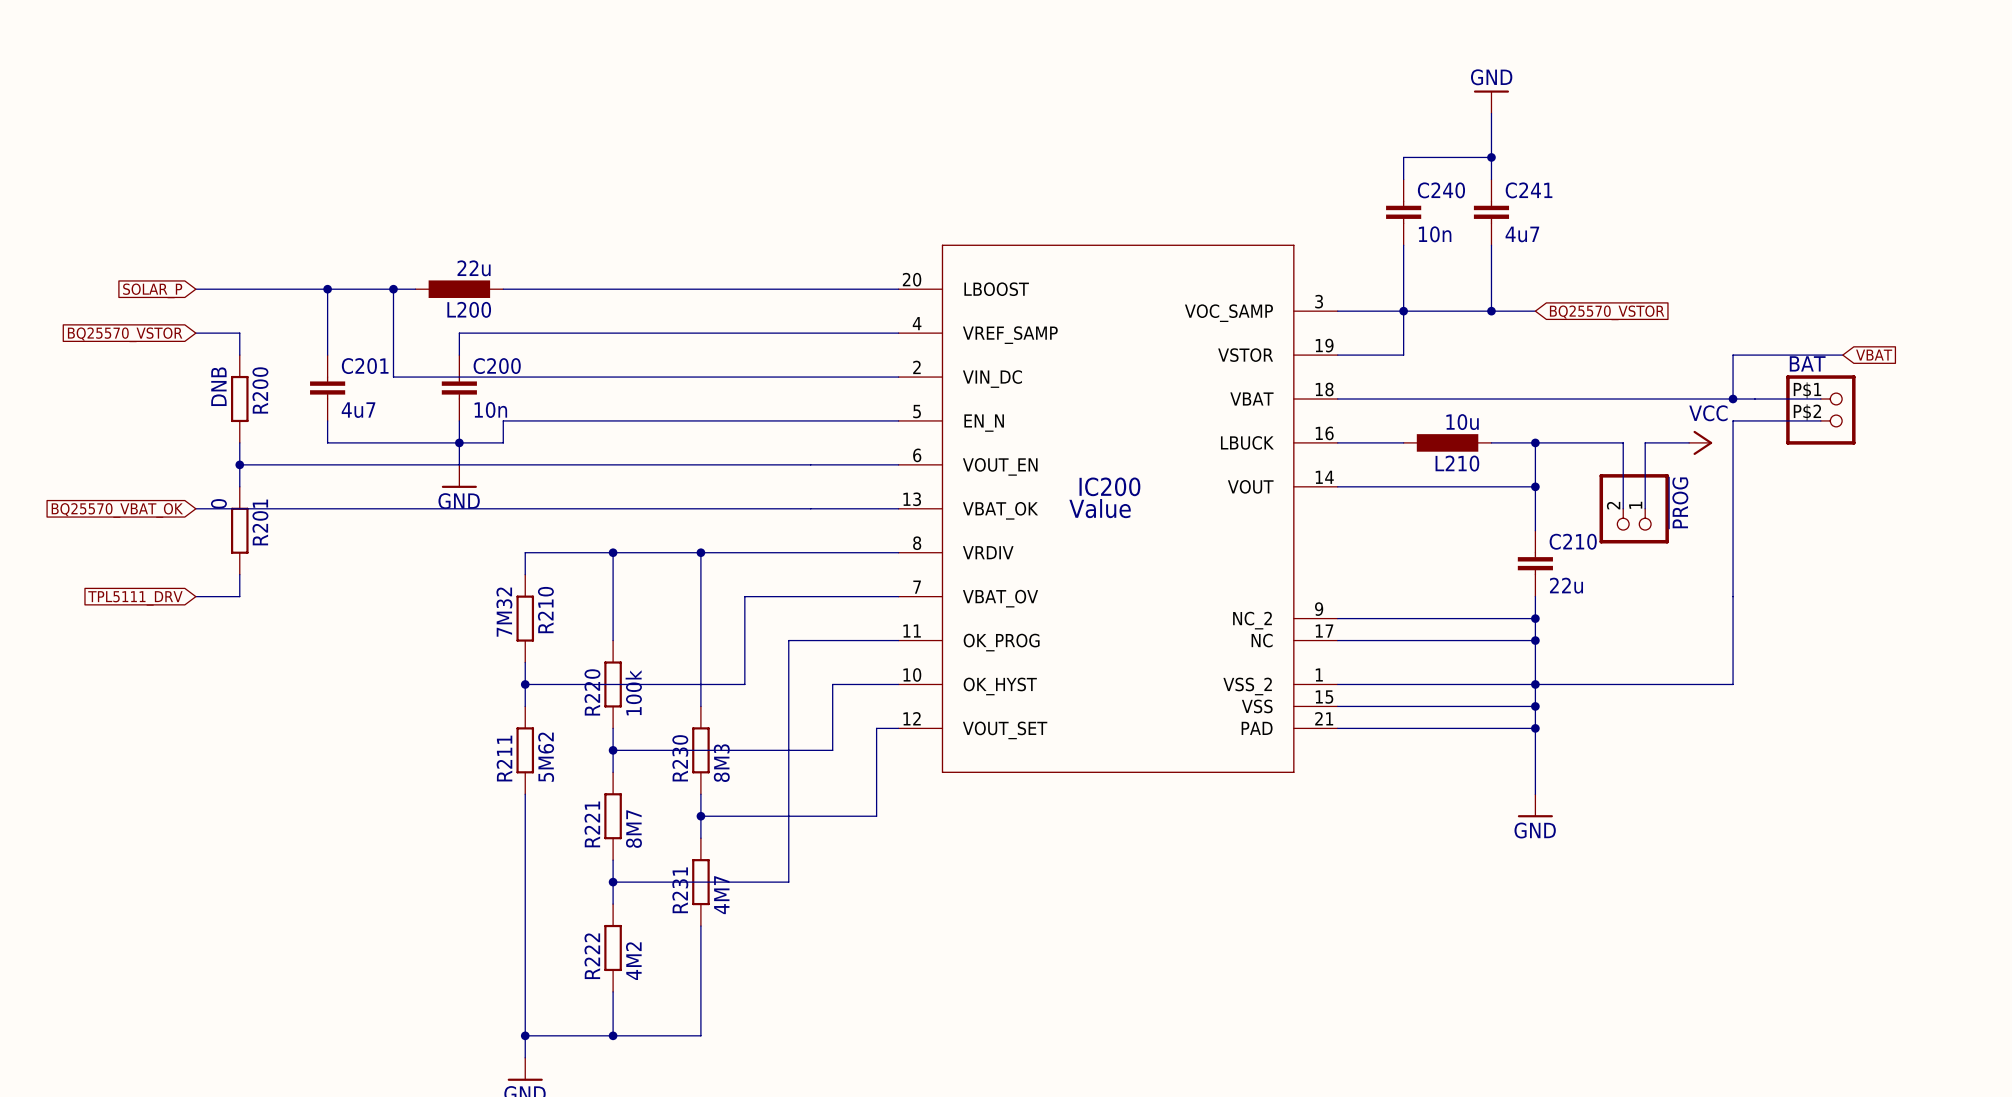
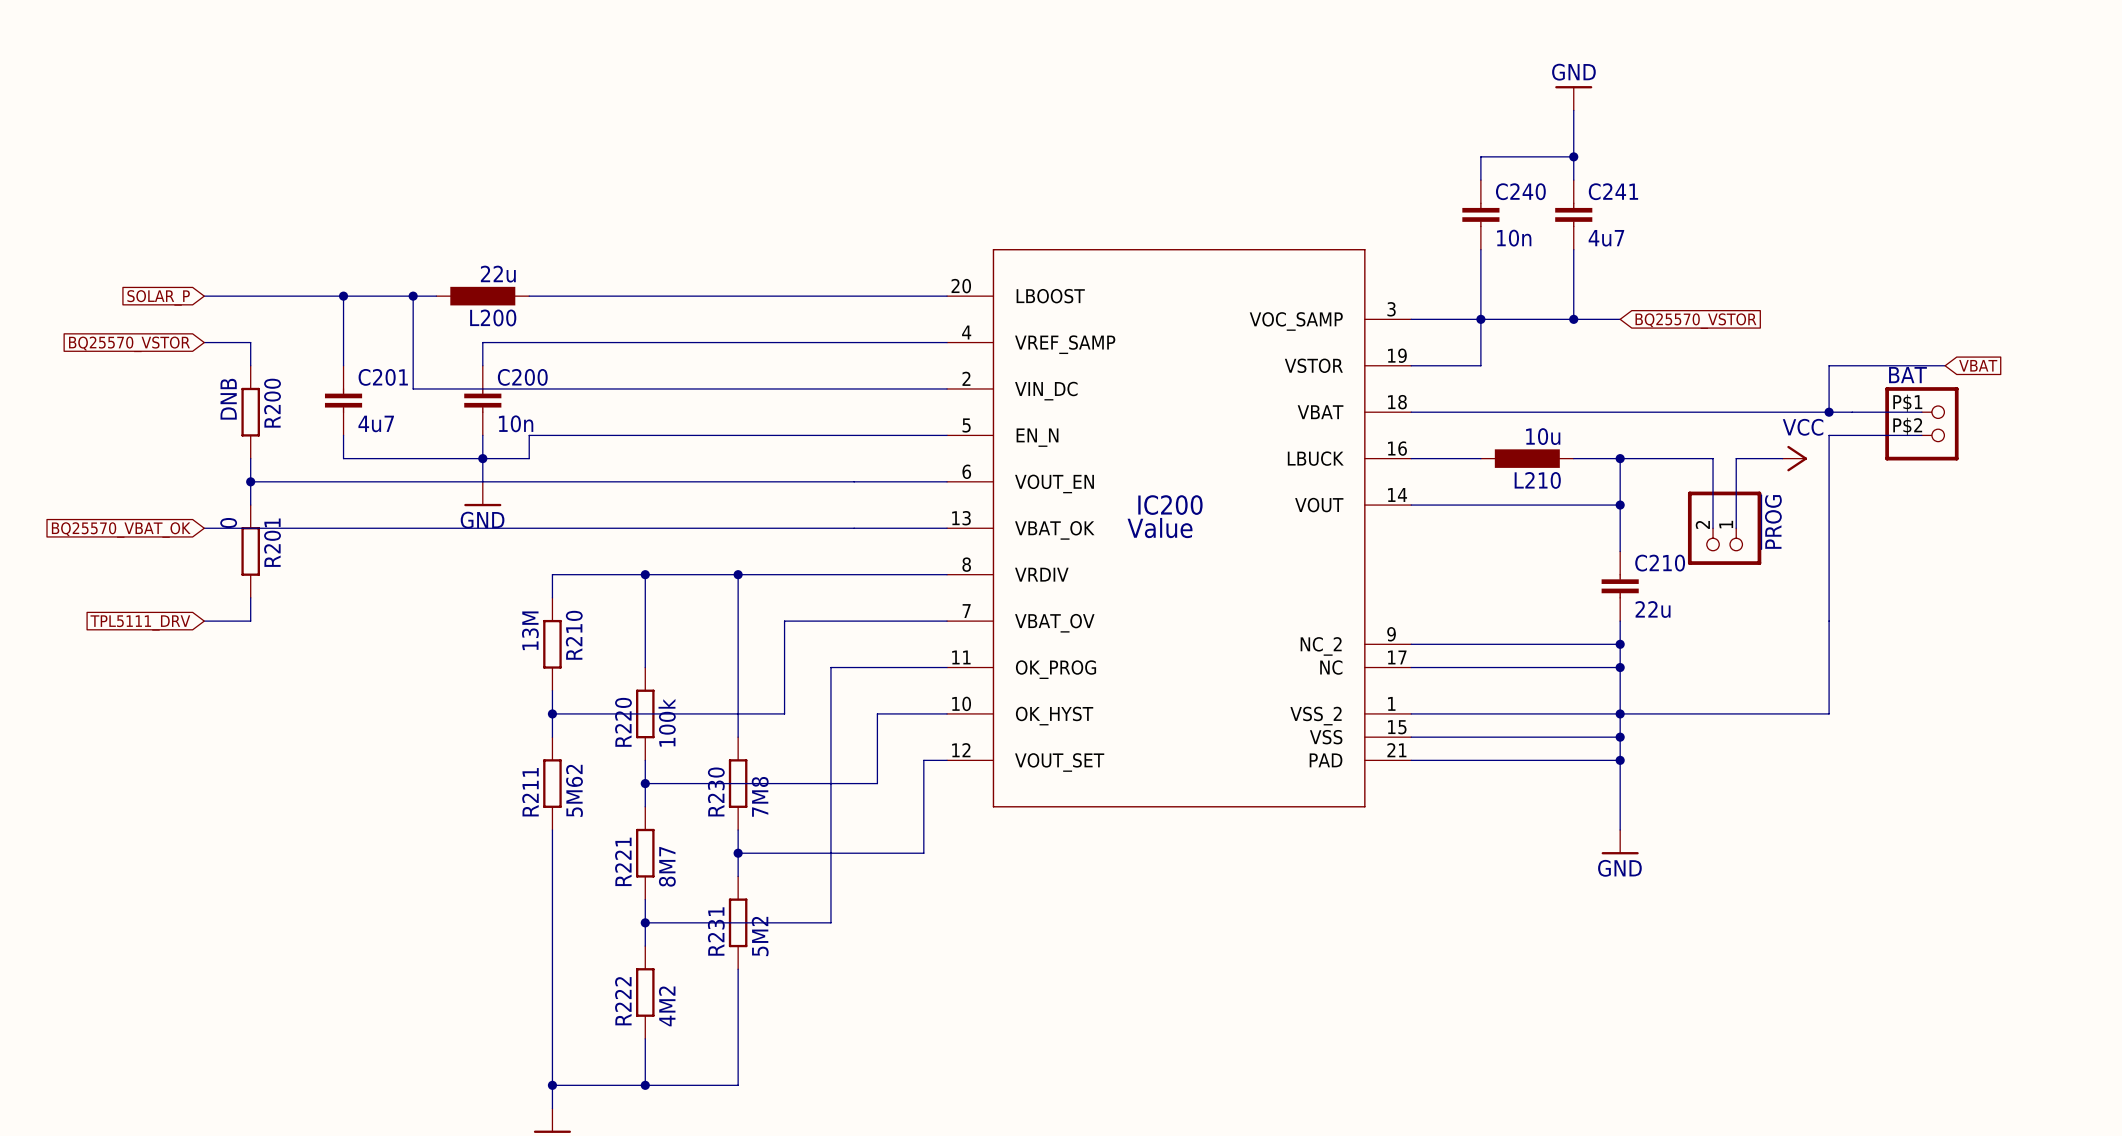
R210 value: 7M32 (504, 612) -> 13M (530, 630)
R230 value: 8M3 (721, 763) -> 7M8 (760, 796)
R231 value: 4M7 (721, 895) -> 5M2 (760, 936)

